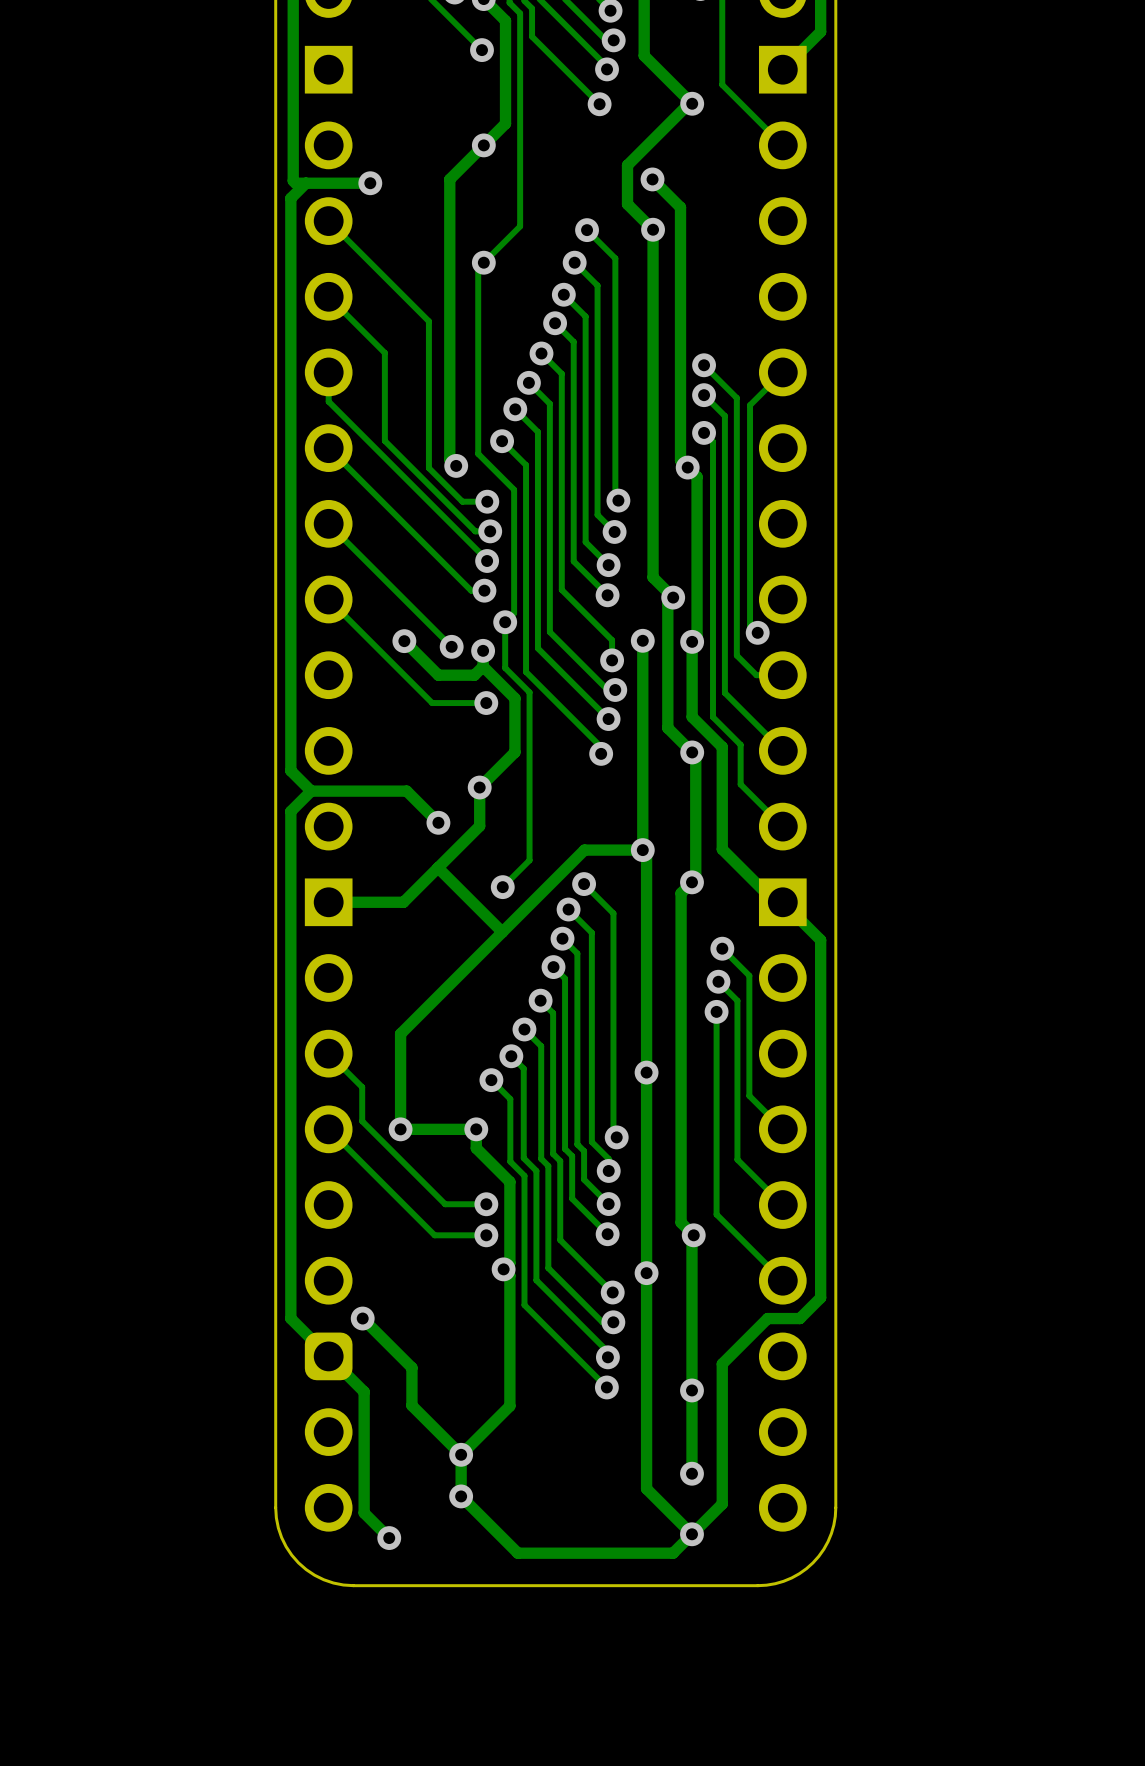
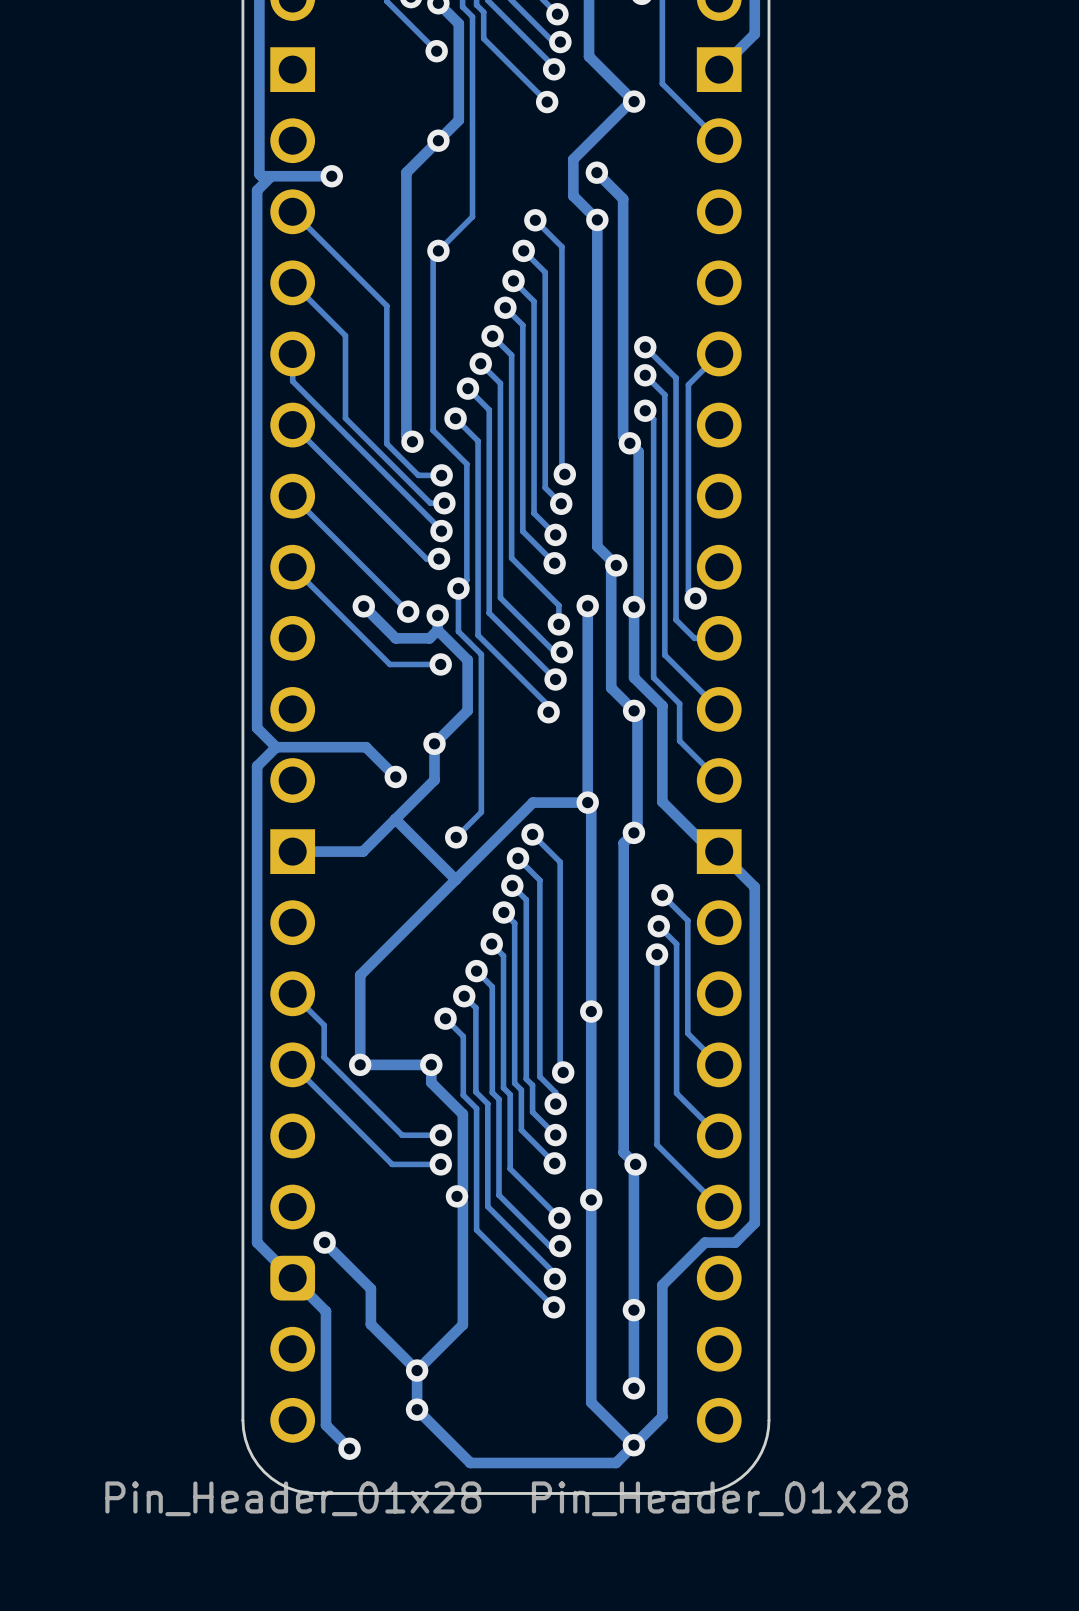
drawing: none -> [105, 1481, 908, 1517]

